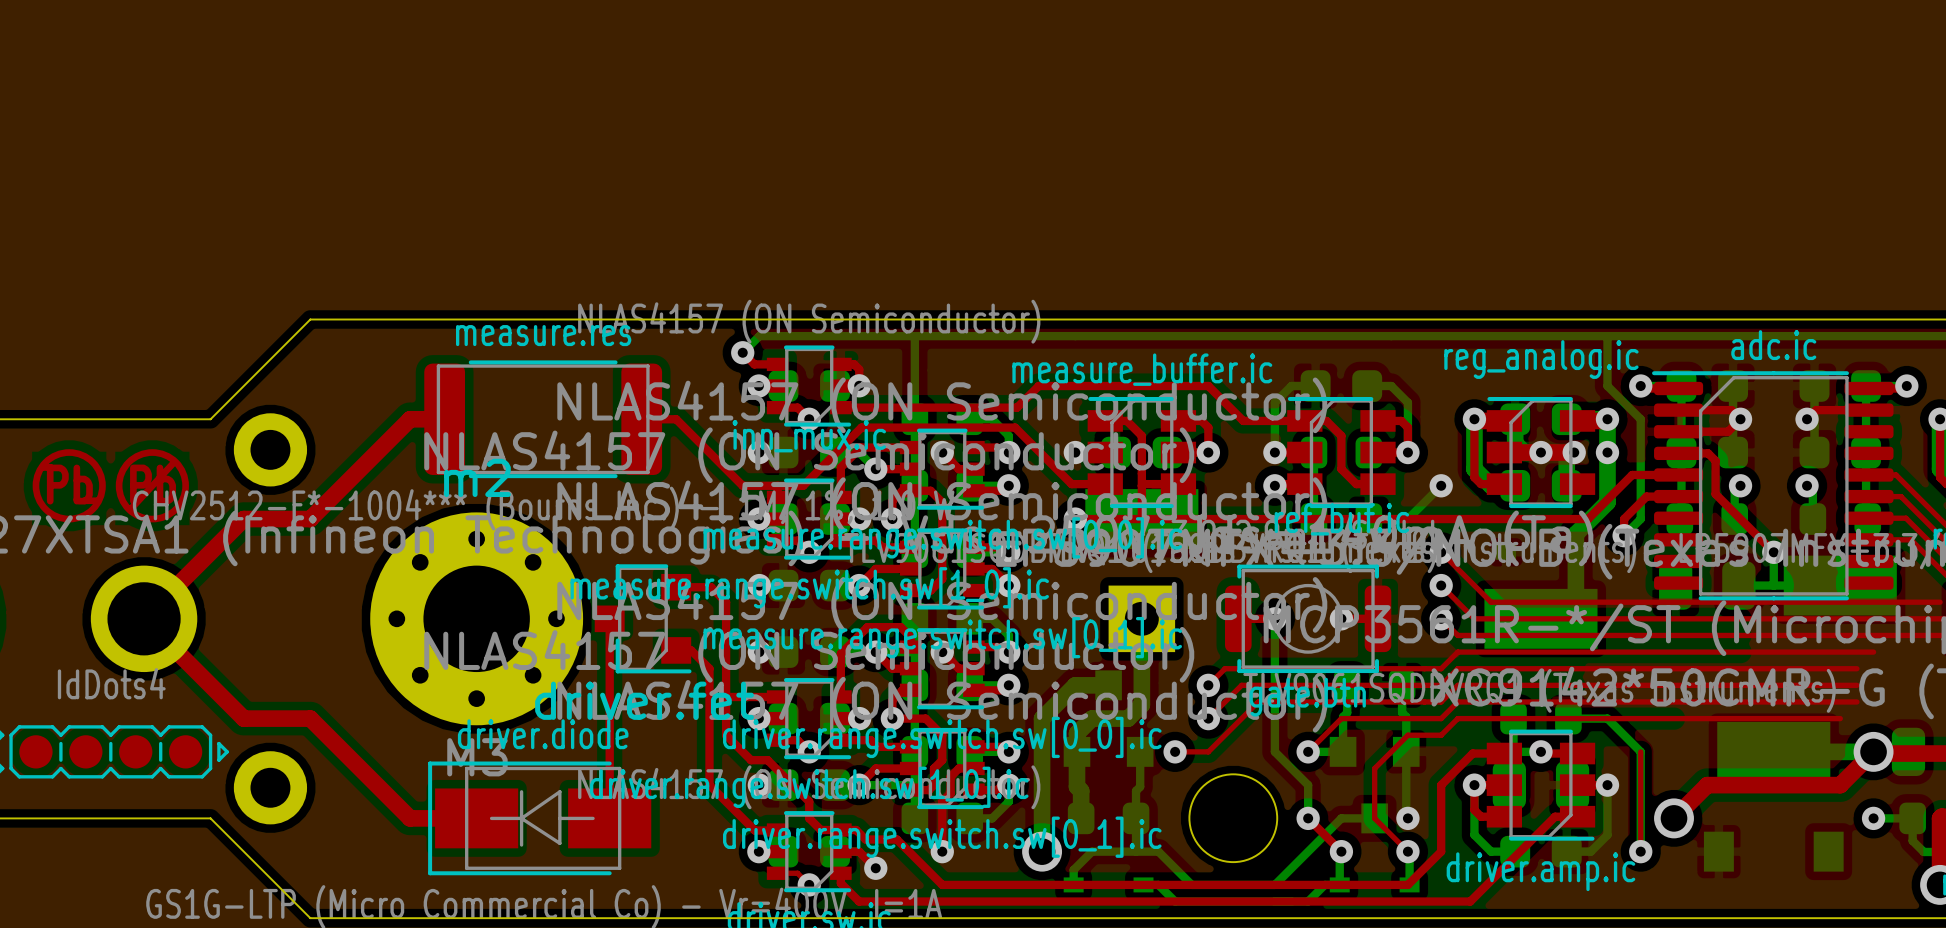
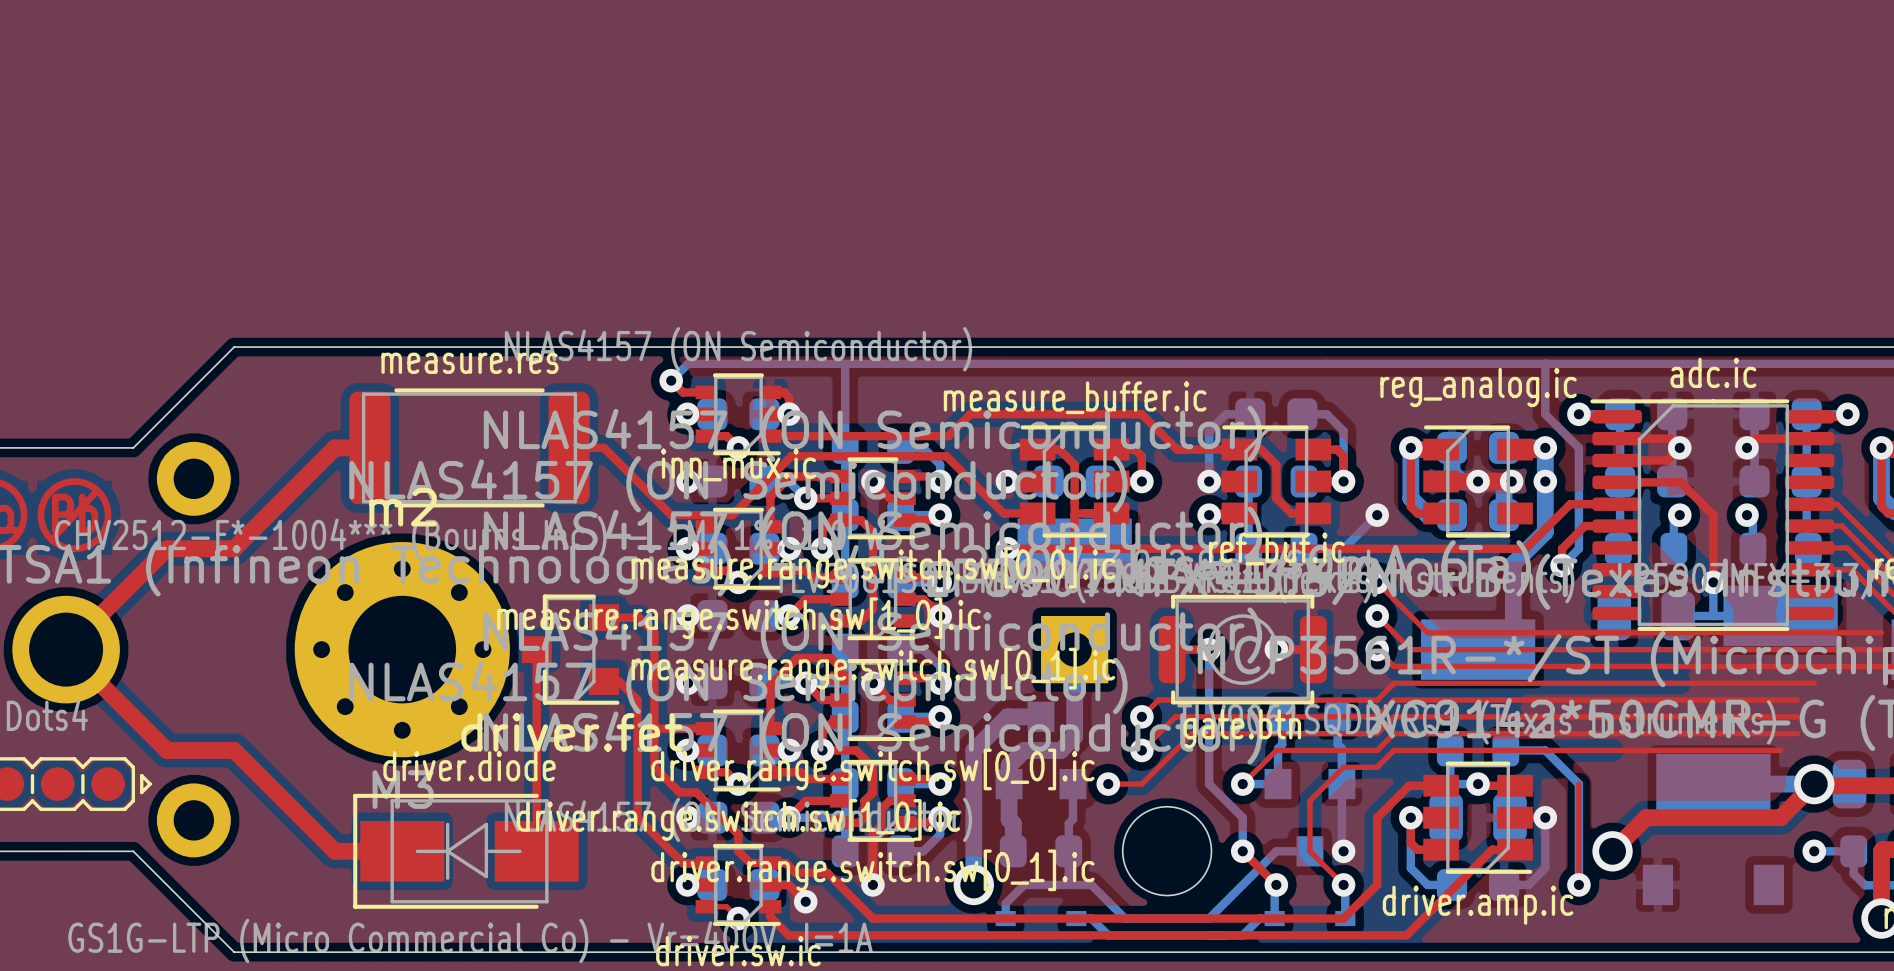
top track: (1708, 453) (1715, 460) (1715, 494) (1773, 552) -> (1646, 482) (1680, 482) (1713, 515) (1713, 582)

